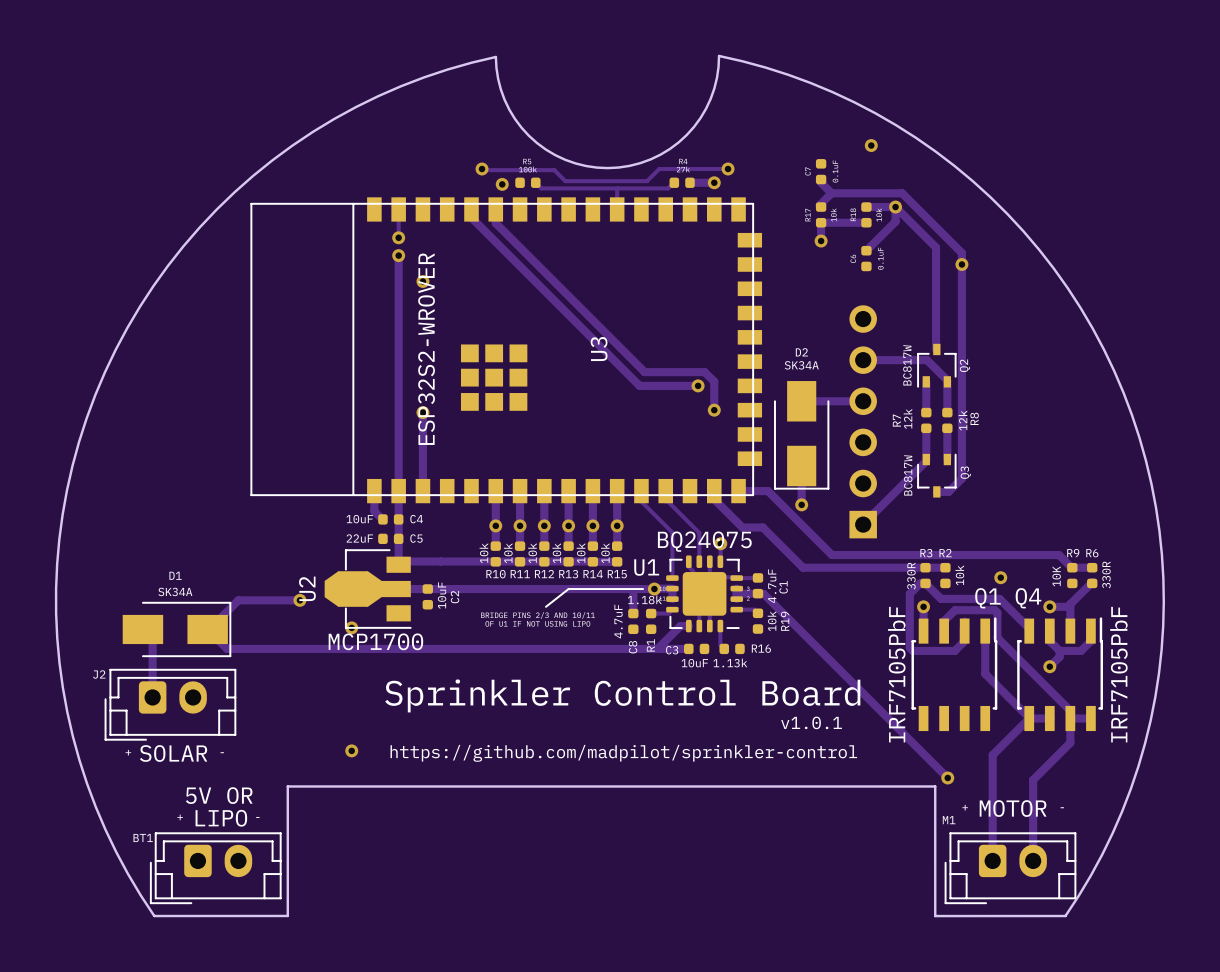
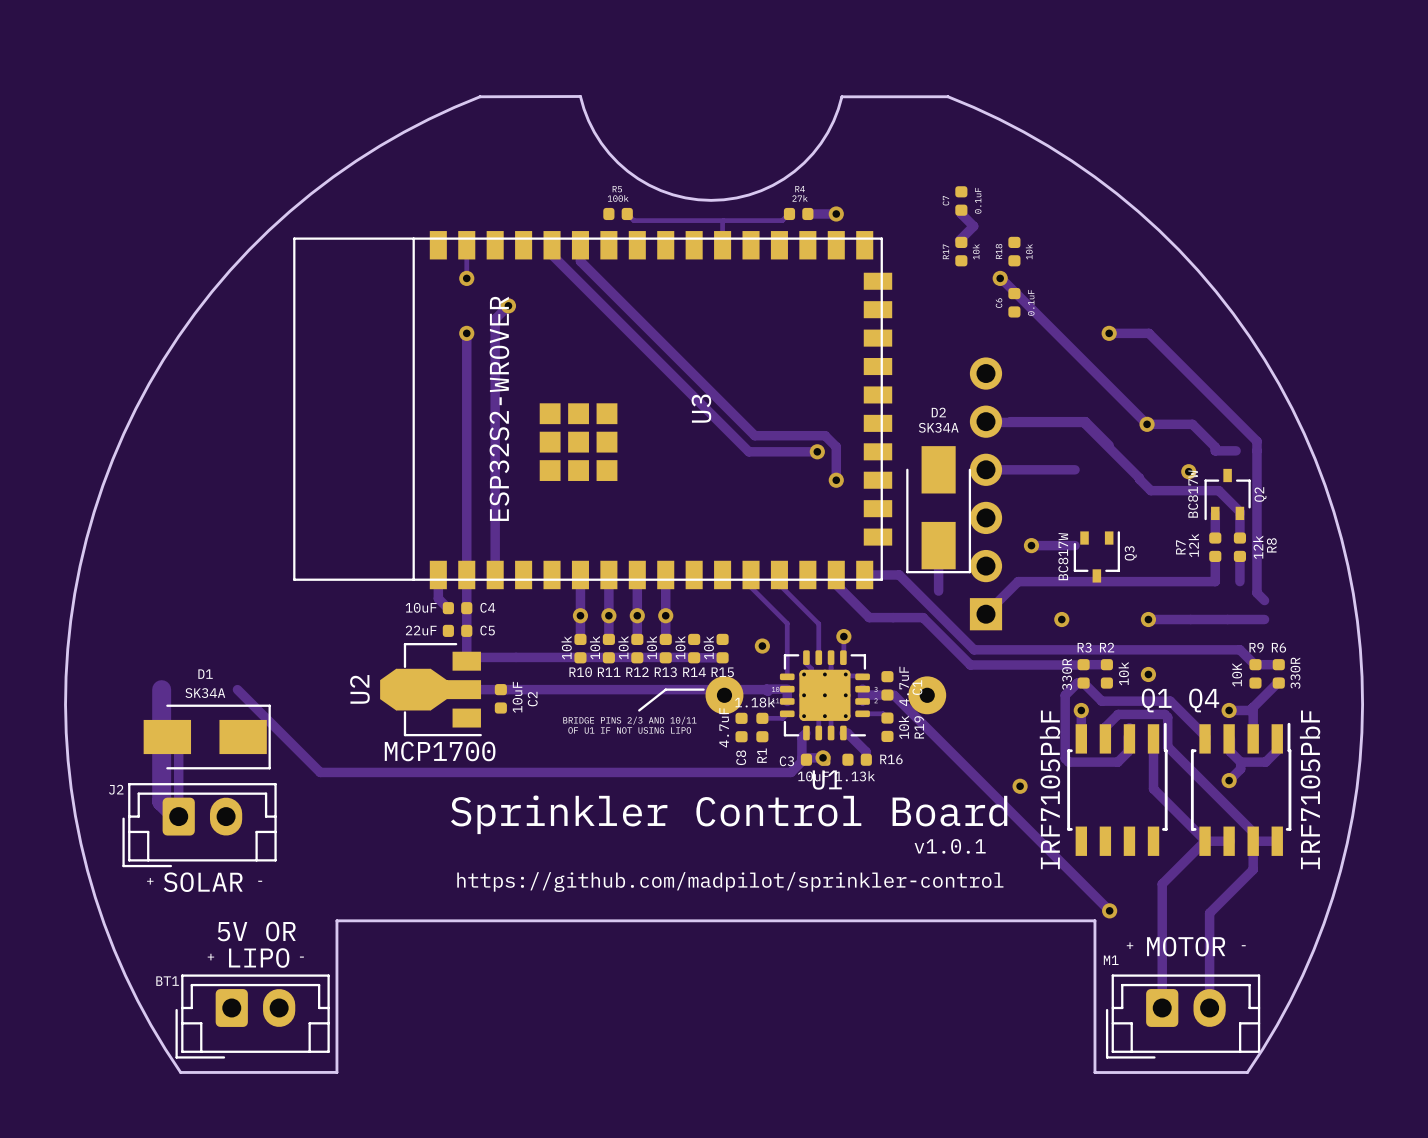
via: (871, 145) -> none
track: (482, 169) (554, 170) (565, 181) (647, 181) (659, 169) (728, 169) -> none
via: (482, 169) -> none
via: (728, 169) -> none
via: (502, 184) -> none
track: (831, 193) (902, 193) (961, 253) (961, 478) (948, 491) (936, 491) -> none
track: (866, 207) (895, 207) -> none
track: (895, 207) (895, 221) (866, 250) -> none
track: (895, 207) (936, 247) (936, 349) -> none
via: (895, 207) -> none
track: (865, 222) (821, 222) (821, 241) -> none
track: none -> (1000, 278) (1147, 424) (1192, 424) (1215, 447) (1215, 450) (1236, 450)
via: none -> (1000, 278)
via: (821, 241) -> none
track: (398, 255) (398, 284) -> none
via: (398, 255) -> none
track: none -> (508, 305) (495, 319) (495, 483)
via: none -> (508, 305)
via position: (961, 264) -> (1109, 333)
via: (422, 281) -> none
via: none -> (466, 333)
track: none -> (1109, 333) (1148, 333) (1256, 441) (1256, 592) (1264, 600)
track: none -> (985, 422) (1083, 422) (1150, 490) (1218, 490) (1239, 511) (1239, 538)
via: none -> (1147, 424)
Q2 position: (936, 365) -> (1227, 494)
track: (926, 381) (926, 412) -> none
track: (947, 381) (947, 412) -> none
track: (801, 401) (842, 401) -> none
track: none -> (1010, 469) (1075, 469)
via: none -> (1188, 471)
via: (422, 412) -> none
R7 position: (926, 420) -> (1215, 547)
R8 position: (947, 420) -> (1239, 547)
part position: (863, 421) -> (985, 493)
track: (926, 428) (926, 459) -> none
track: (947, 428) (947, 459) -> none
track: none -> (1215, 513) (1215, 536)
track: (926, 461) (863, 524) -> none
track: none -> (1031, 545) (1075, 545)
via: none -> (1031, 545)
track: none -> (1215, 556) (1215, 581) (1018, 581) (985, 613)
track: none -> (1239, 556) (1239, 581)
track: (592, 491) (592, 546) -> none
track: (617, 491) (617, 546) -> none
via: (801, 504) -> none
via: (592, 525) -> none
via: (617, 525) -> none
track: (762, 527) (803, 567) (925, 567) -> (893, 617) (923, 617) (970, 664) (1084, 664)
via: none -> (1061, 619)
track: none -> (1148, 619) (1264, 619)
via: none -> (1148, 619)
U1 value: BQ24075 (704, 541) -> none
via: none -> (762, 646)
U1 footprint: [666, 555, 744, 633] -> [779, 650, 870, 741]
U1 name position: U1 (646, 567) -> U1 (827, 780)
via position: (1000, 577) -> (1148, 674)
track: (736, 578) (757, 578) -> none
track: none -> (161, 689) (161, 801) (174, 814)
track: none -> (237, 689) (320, 772) (790, 772) (802, 761) (802, 757) (823, 757)
line: (600, 589) (643, 589) -> none
track: (633, 589) (633, 613) -> none
via: (654, 589) -> none
part: none -> (724, 695)
part: none -> (927, 695)
track: (299, 600) (238, 600) (209, 629) -> none
via: (299, 600) -> none
track: (688, 626) (680, 626) (657, 648) -> (805, 733) (801, 737) (801, 757)
track: (720, 626) (720, 645) -> (843, 733) (847, 733) (866, 751) (866, 757)
via: (351, 627) -> none
track: (207, 629) (227, 648) (688, 648) -> none
via: none -> (823, 757)
via: none -> (1020, 786)
via: (351, 750) -> none
board edge: (154, 916) (127, 873) (105, 829) (79, 760) (62, 687) (56, 613) (57, 563) (62, 514) (79, 442) (104, 372) (127, 327) (153, 285) (199, 227) (253, 175) (313, 131) (356, 107) (401, 86) (447, 69) (495, 56) (498, 78) (504, 99) (514, 118) (528, 135) (545, 149) (565, 159) (586, 166) (618, 167) (650, 159) (669, 149) (686, 135) (700, 118) (710, 98) (716, 77) (719, 56) (765, 67) (832, 92) (895, 125) (954, 165) (1007, 213) (1053, 268) (1092, 328) (1123, 392) (1145, 460) (1159, 530) (1163, 602) (1161, 649) (1150, 720) (1130, 789) (1102, 854) (1065, 916) -> (180, 1072) (137, 1000) (104, 923) (80, 843) (68, 760) (66, 676) (70, 621) (86, 539) (112, 459) (149, 384) (194, 313) (249, 250) (311, 193) (356, 160) (404, 132) (480, 96) (580, 96) (594, 132) (609, 153) (627, 171) (649, 185) (672, 194) (711, 200) (736, 197) (761, 190) (794, 171) (820, 143) (833, 121) (841, 96) (947, 96) (999, 119) (1048, 145) (1116, 193) (1179, 250) (1216, 291) (1249, 336) (1279, 383) (1304, 433) (1333, 512) (1353, 593) (1360, 649) (1362, 704) (1360, 760) (1352, 816) (1332, 897) (1302, 975) (1277, 1025) (1247, 1072)

